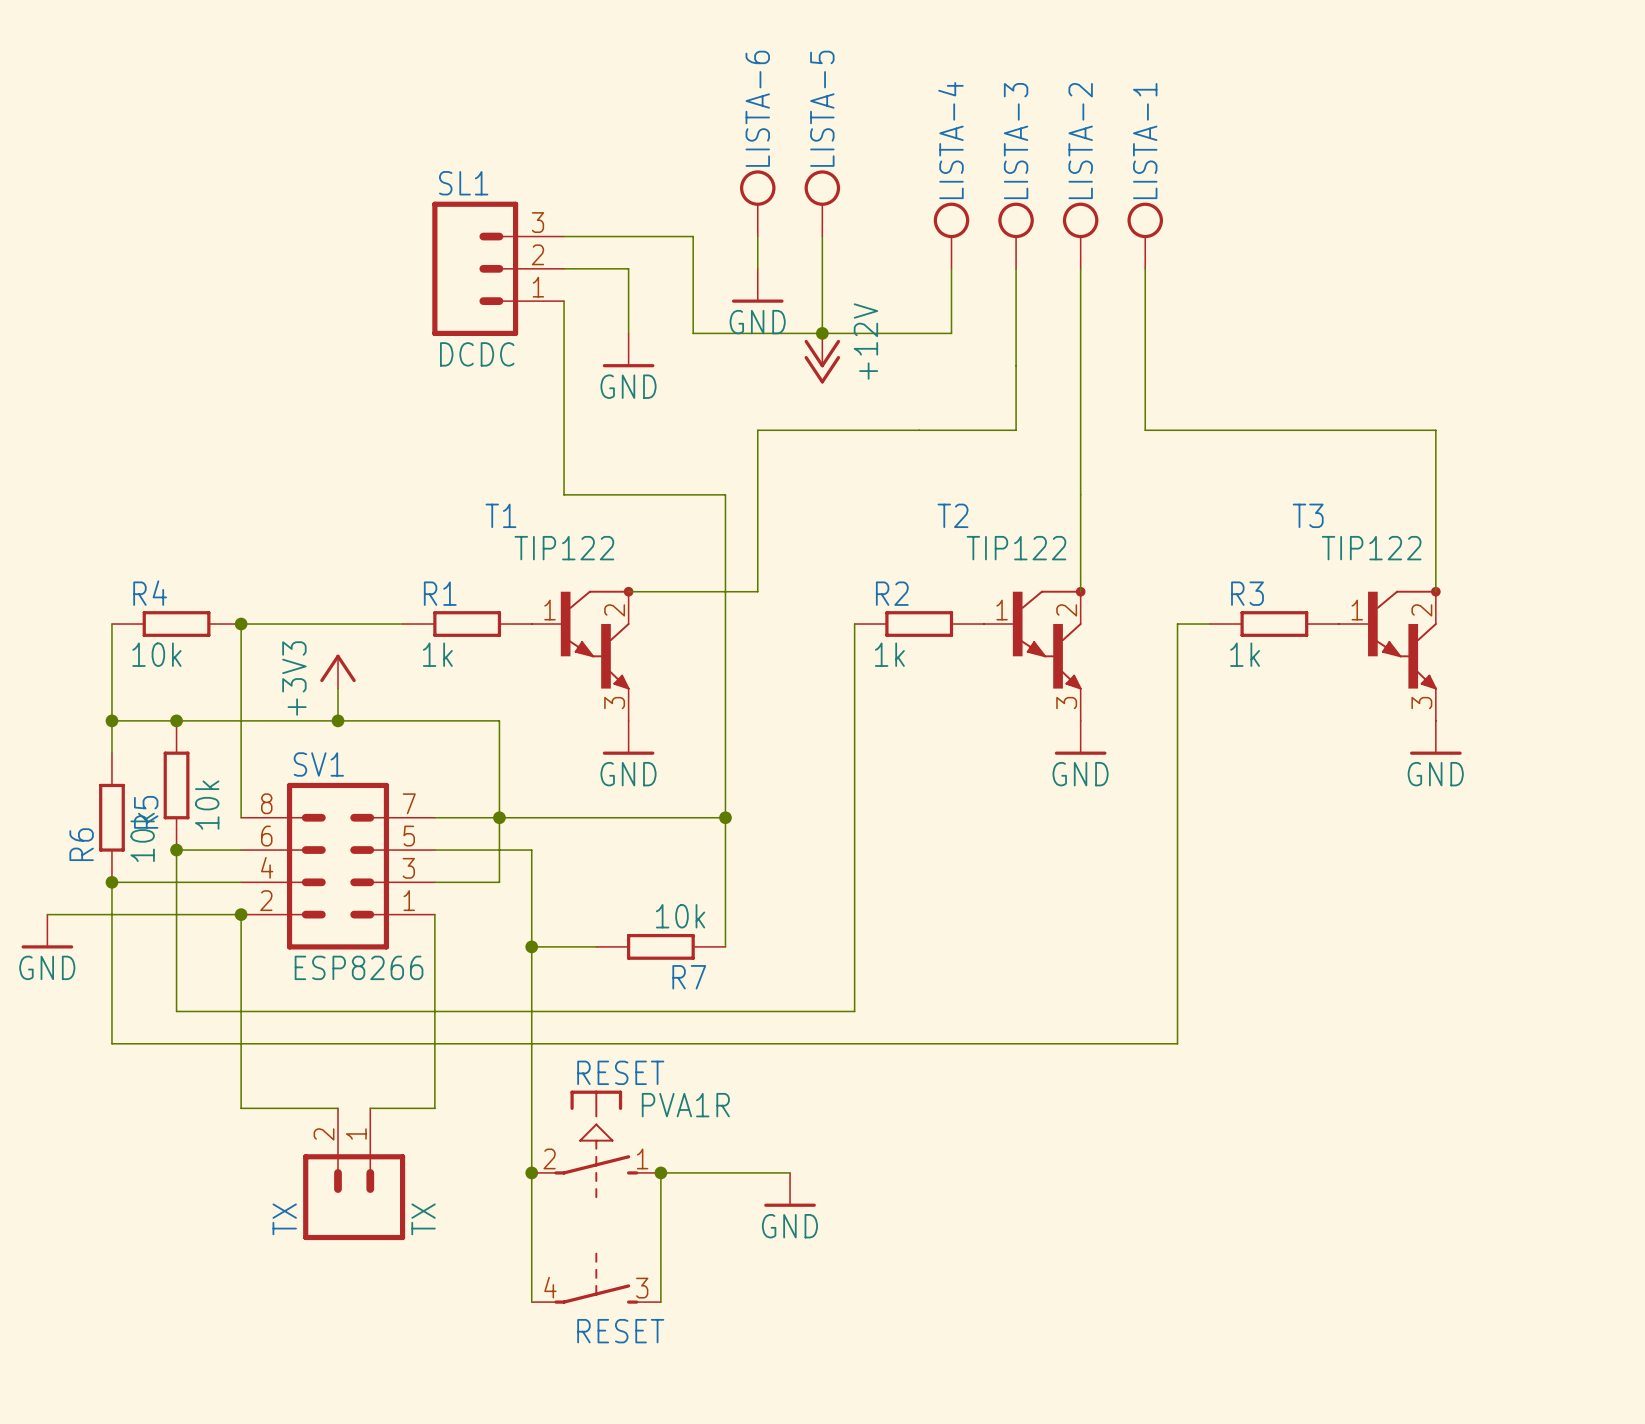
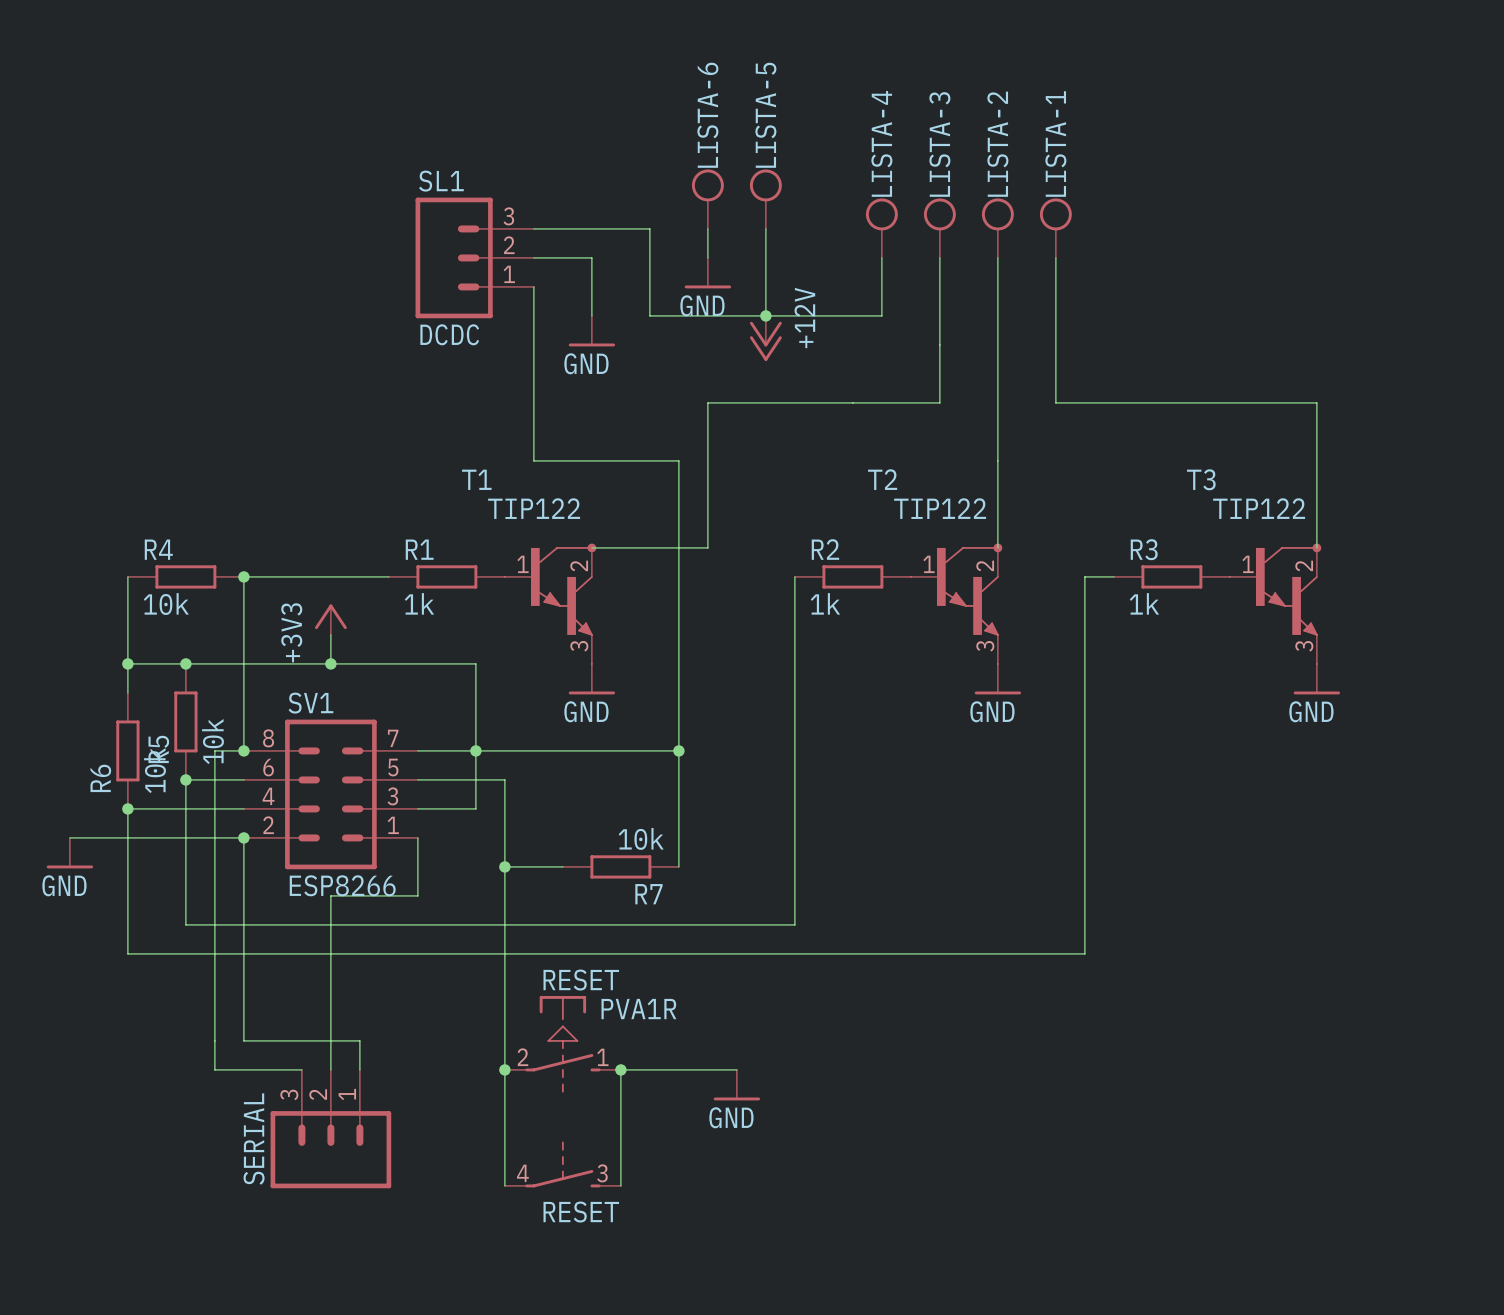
wire: none -> (243, 750) (214, 750) (214, 1069) (301, 1069)
junction: none -> (243, 750)
wire: (434, 979) (434, 1108) (370, 1108) -> (417, 895) (330, 895) (330, 1069)
wire: (241, 1108) (338, 1108) -> (243, 1011) (243, 1040) (359, 1040) (359, 1069)
TX: TX (354, 1174) -> none
SERIAL: none -> (330, 1129)

